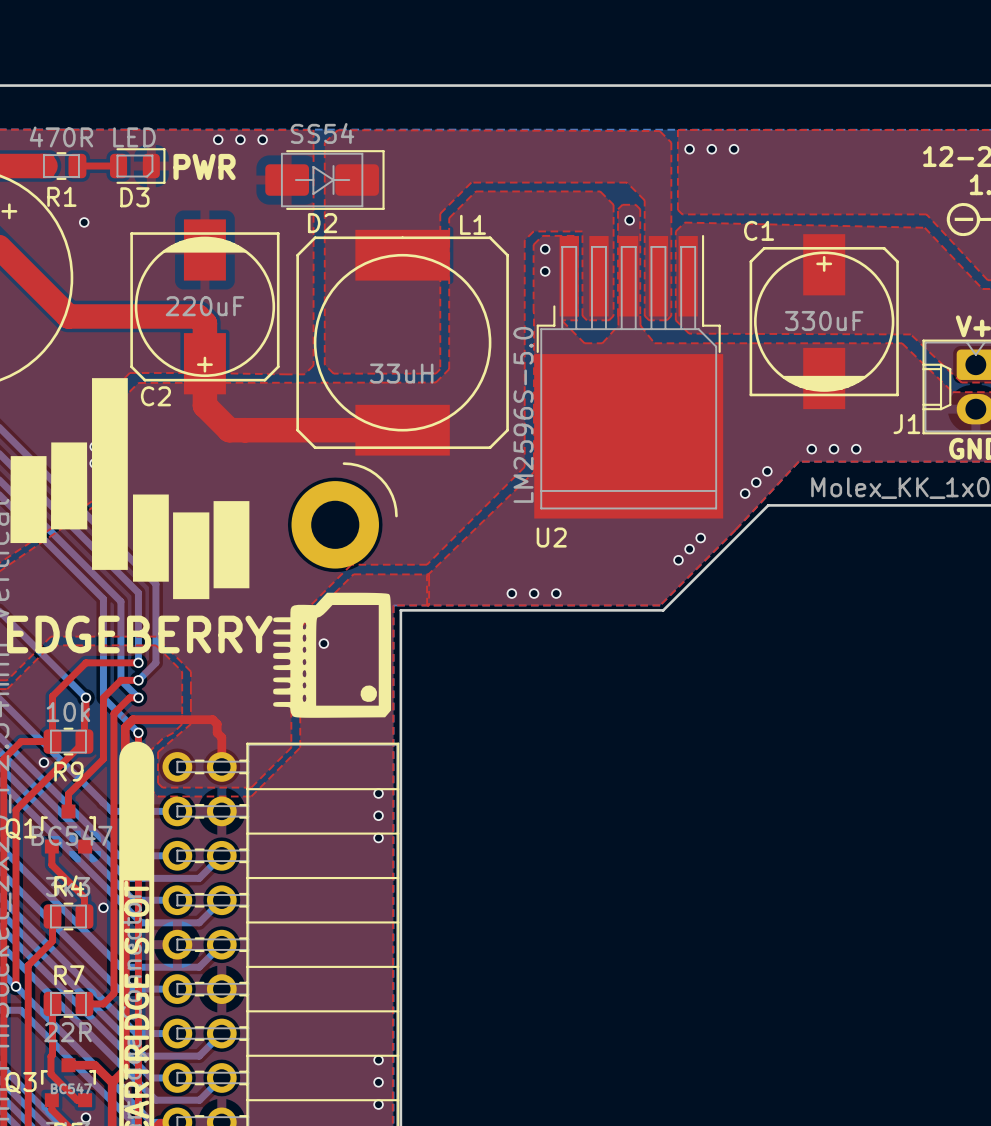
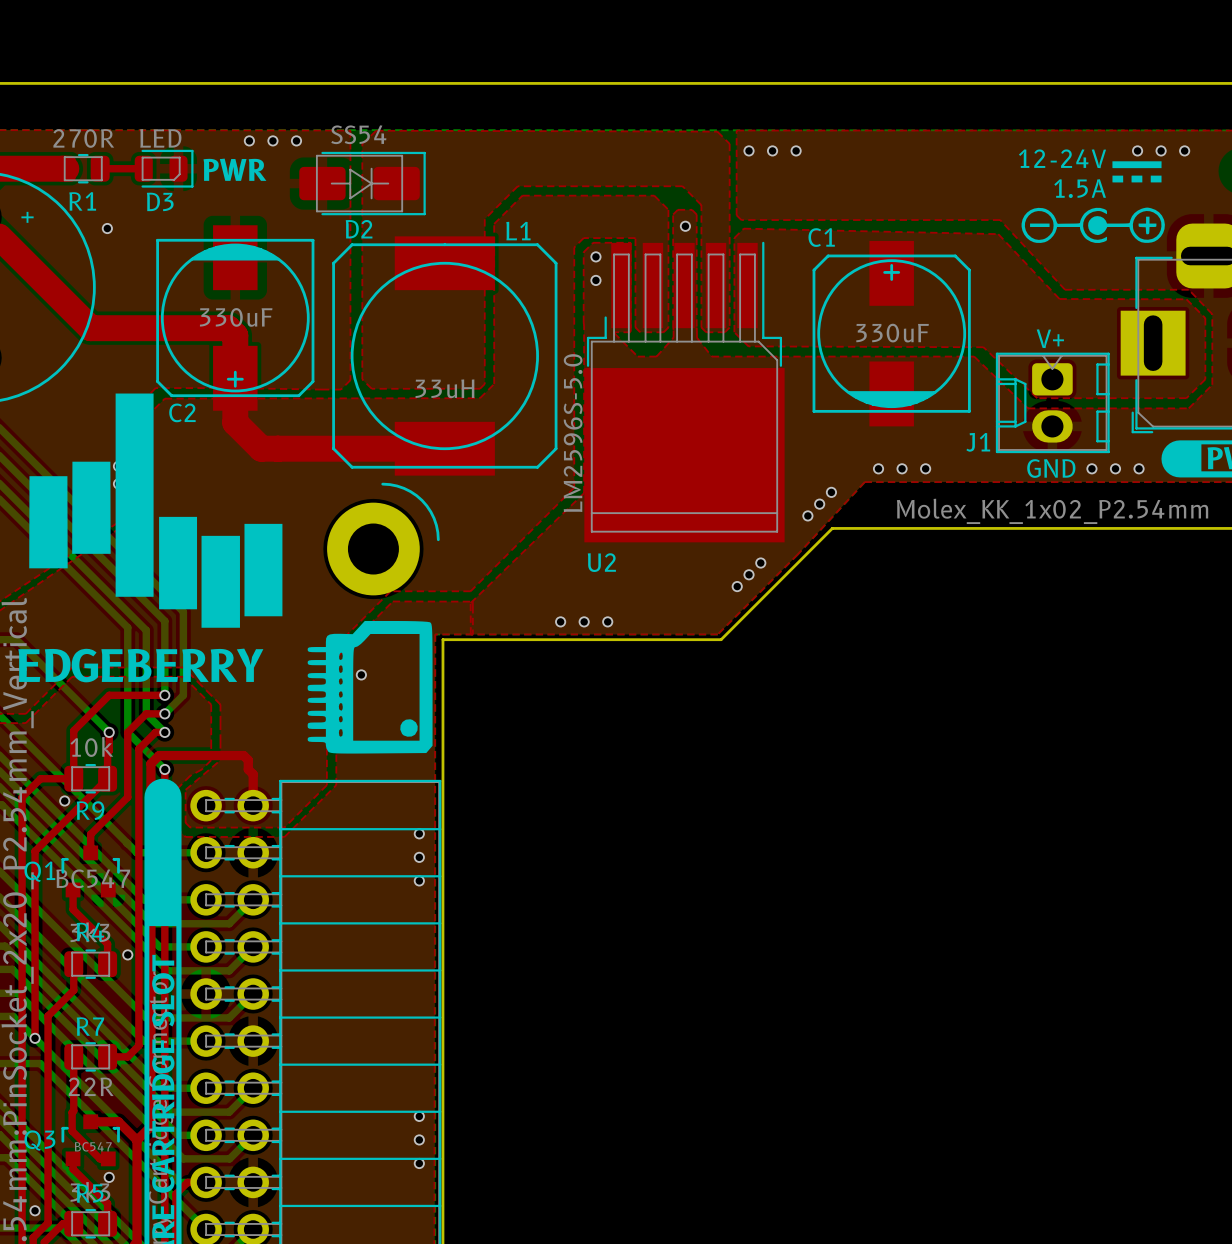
R1 value: 470R (61, 136) -> 270R (83, 138)
C2 value: 220uF (204, 306) -> 330uF (236, 317)

